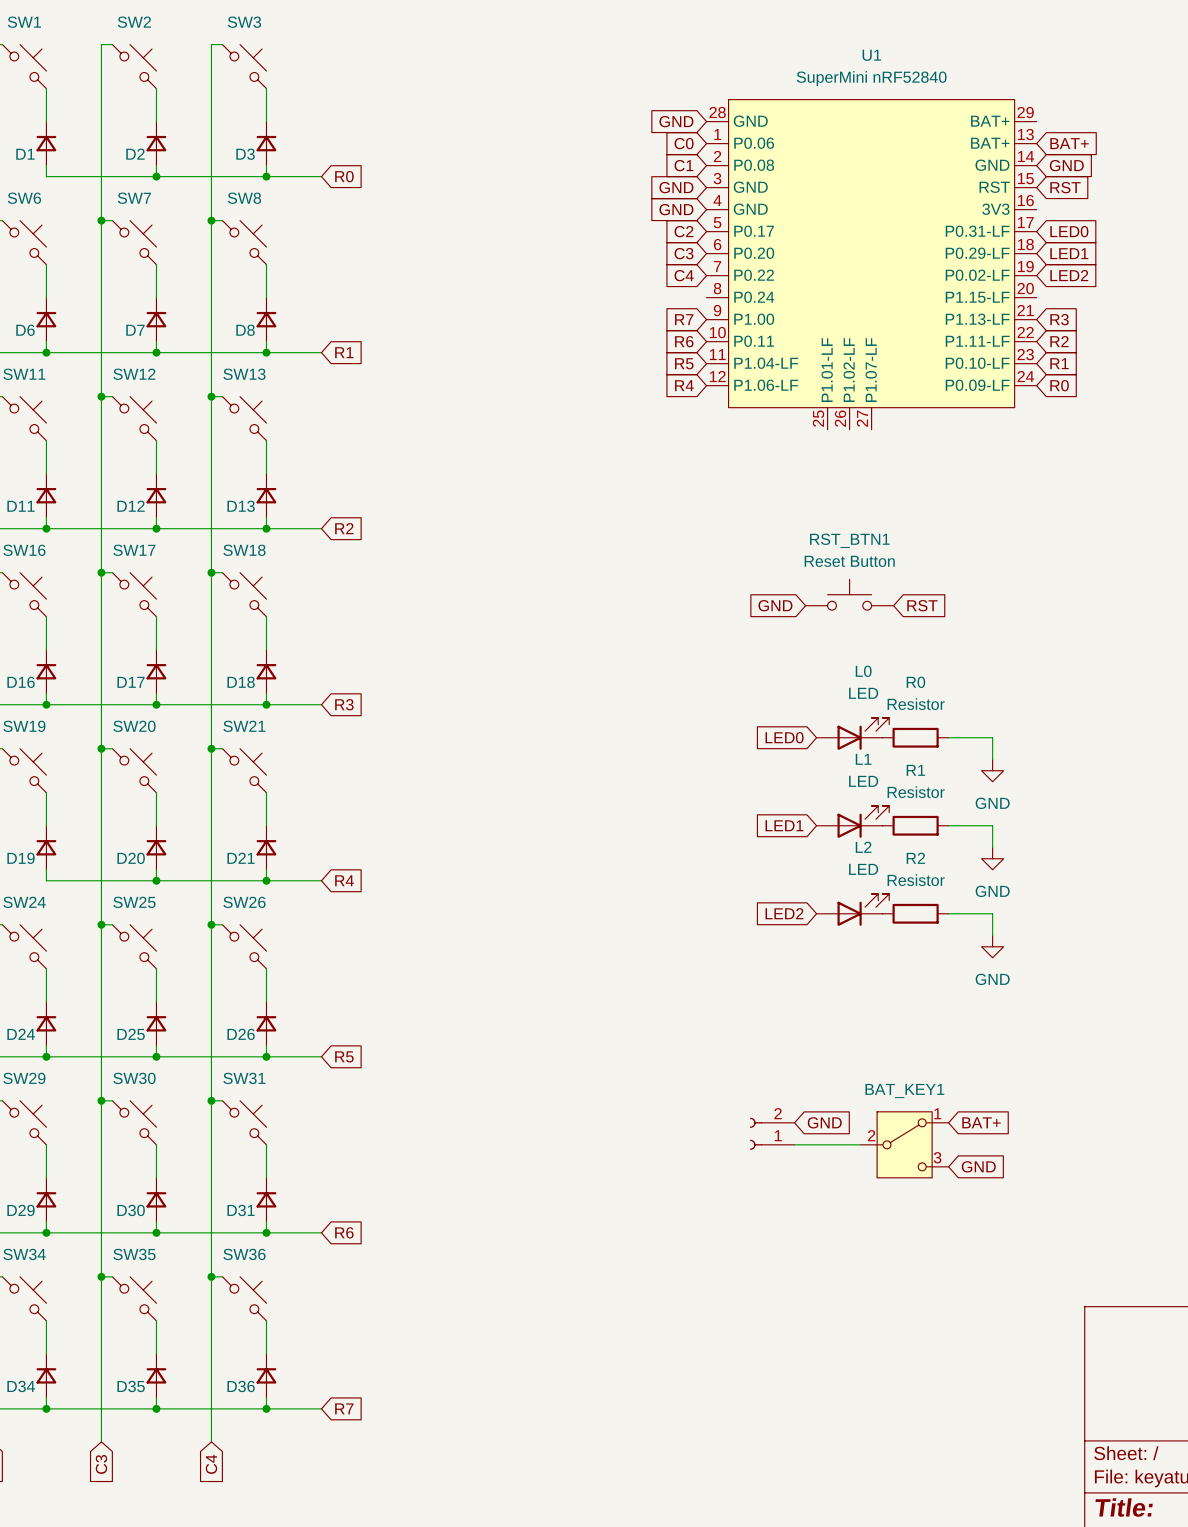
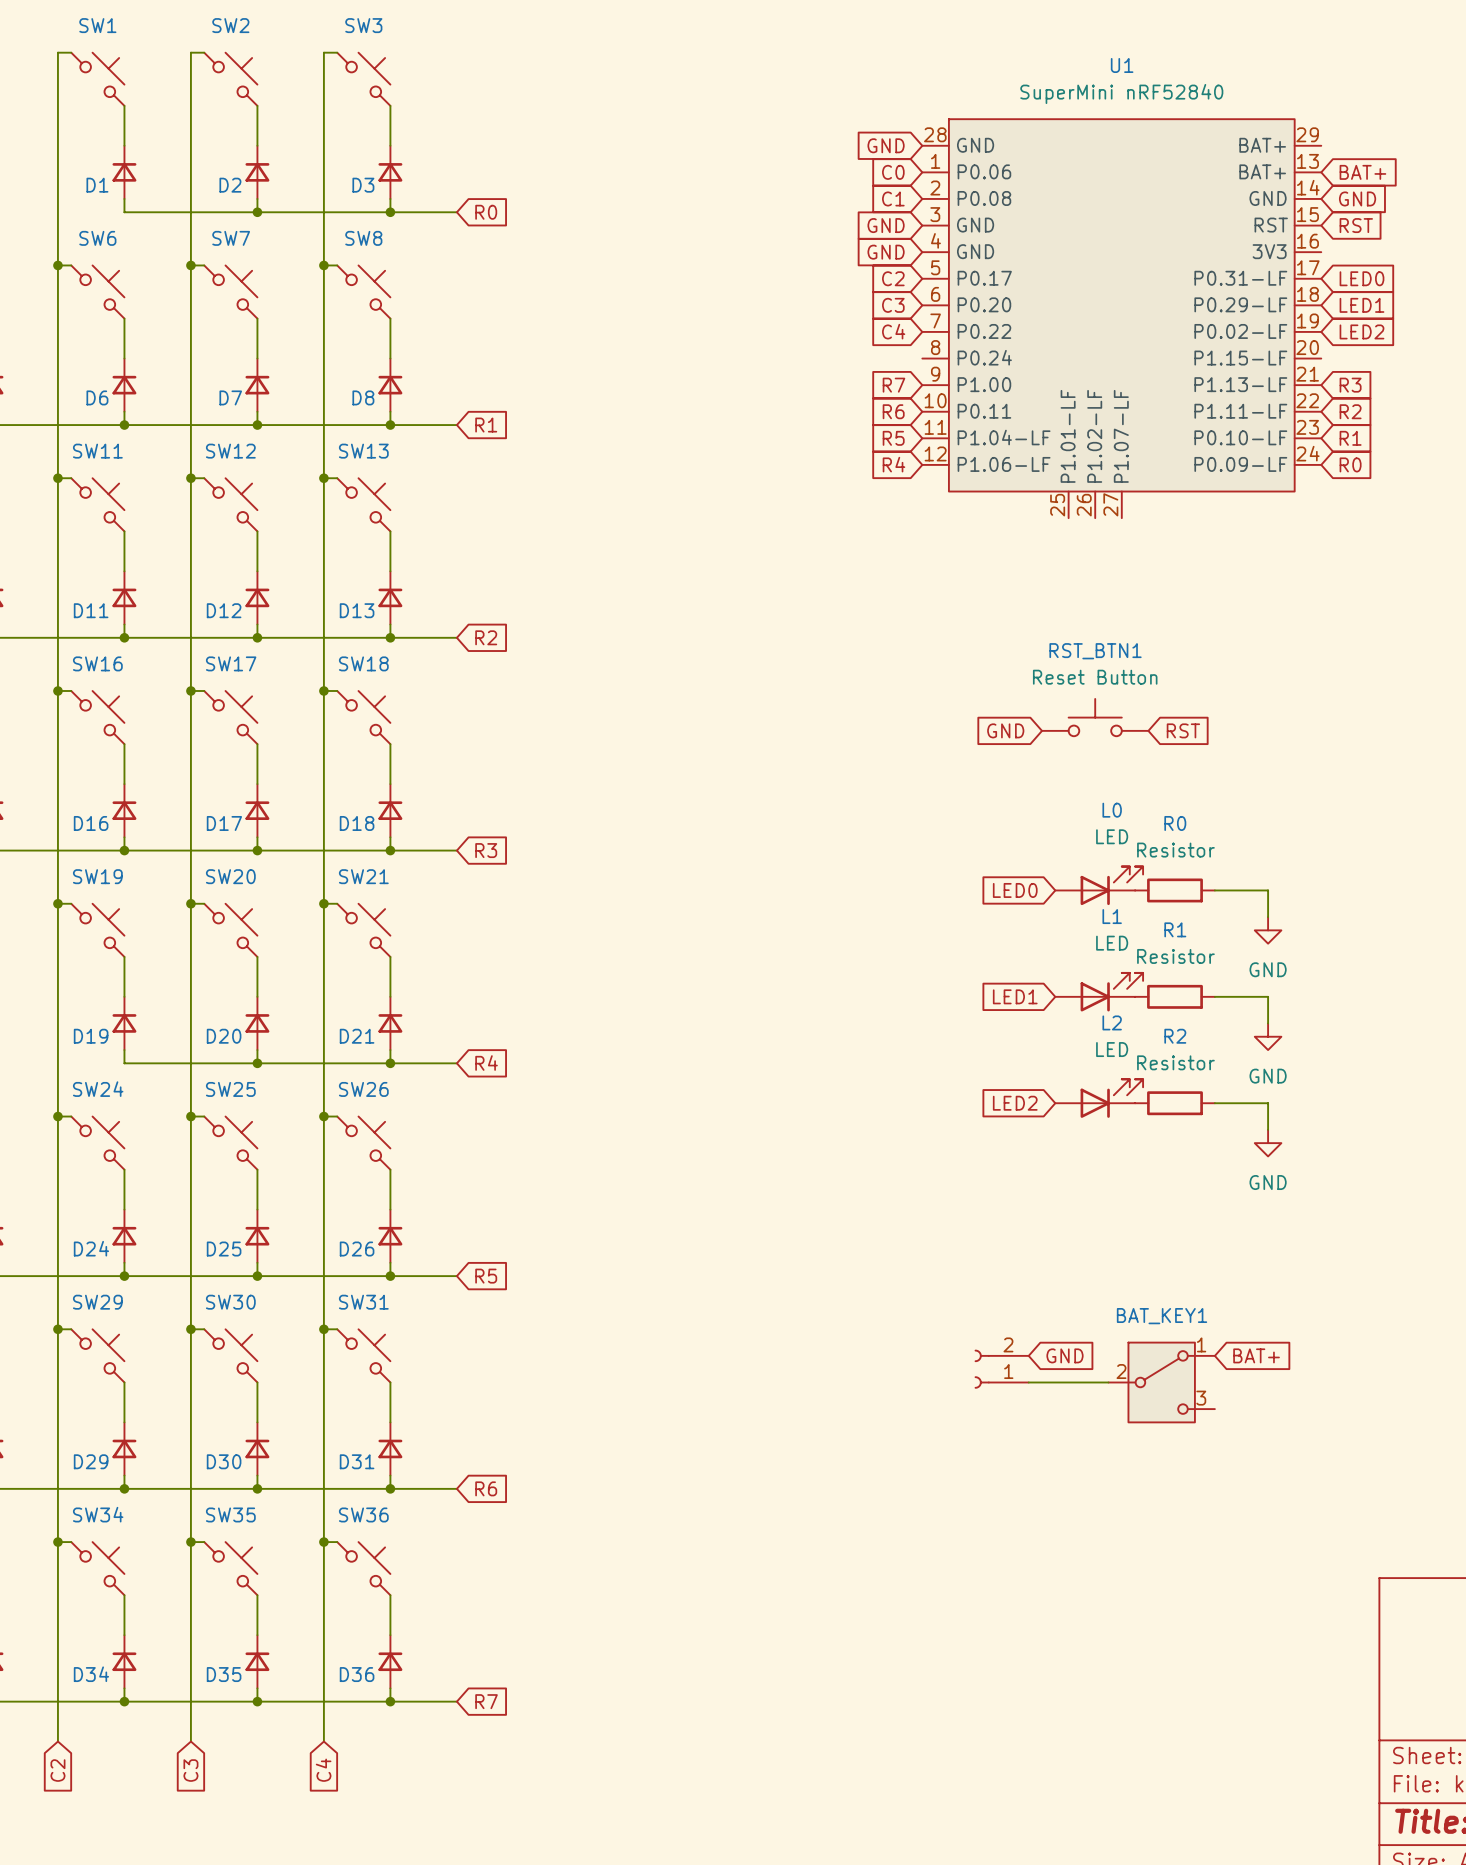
global label: GND (978, 1166) -> none

